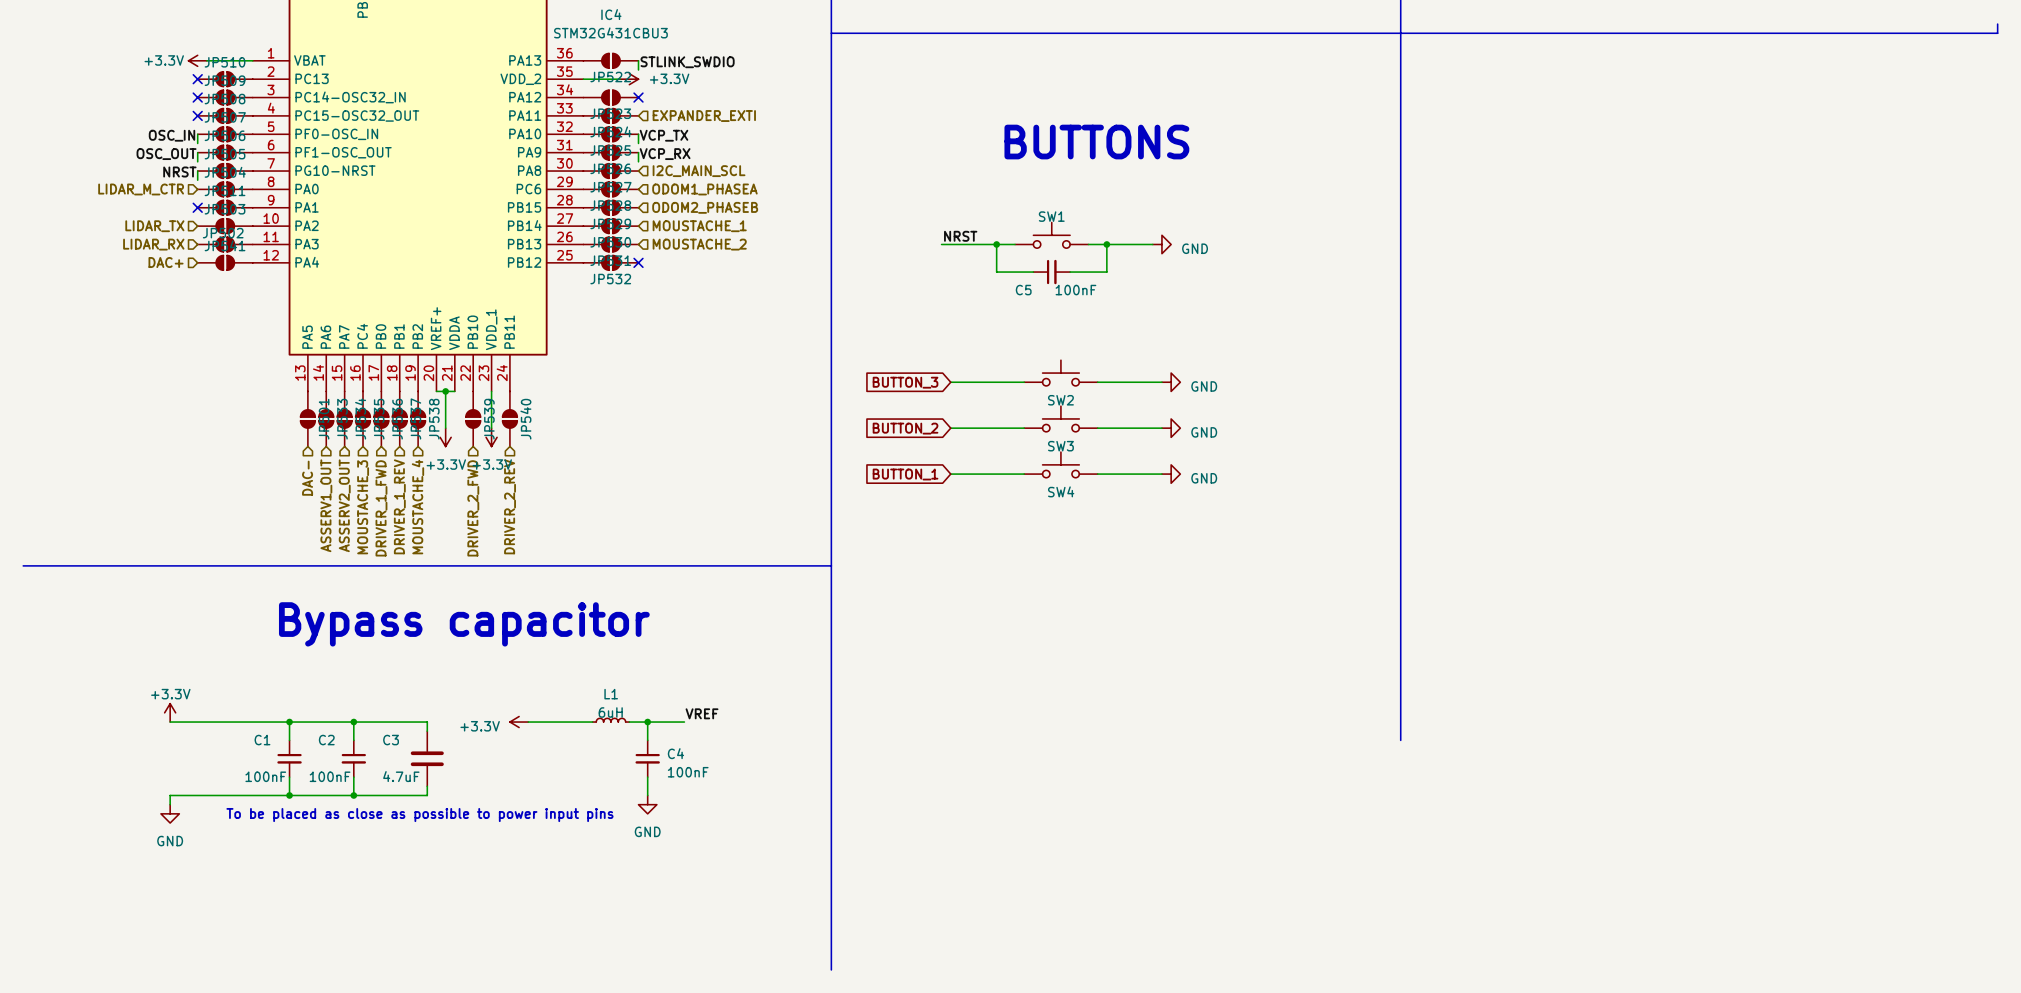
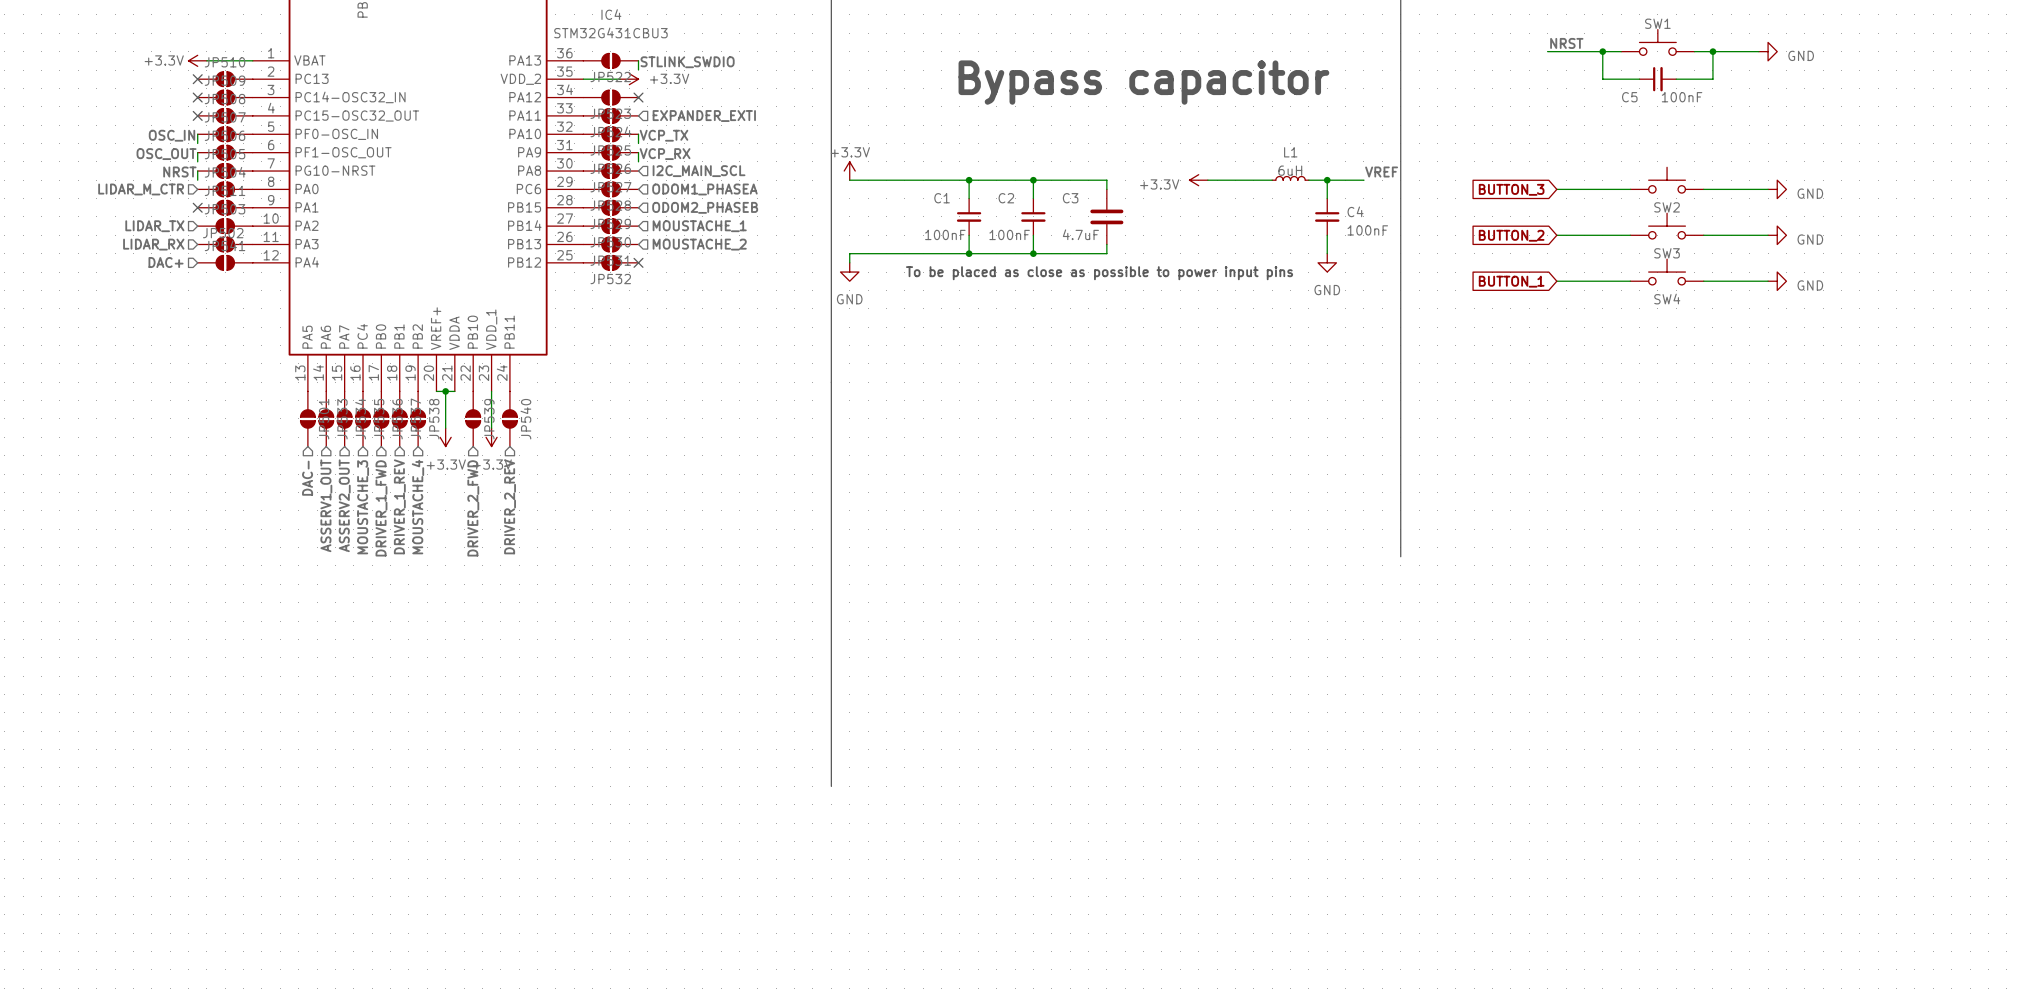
line: (1997, 24) (1997, 33) (831, 33) -> none
label: none -> NRST (1566, 43)
wire: none -> (1547, 51) (1621, 51)
wire: none -> (1602, 51) (1602, 79) (1639, 79)
junction: none -> (1602, 51)
wire: none -> (1694, 51) (1758, 51)
wire: none -> (1712, 51) (1712, 79) (1676, 79)
junction: none -> (1712, 51)
power symbol: none -> GND (1768, 51)
text: none -> Bypass capacitor (1143, 82)
text: BUTTONS (1096, 142) -> none
power symbol: none -> +3.3V (849, 171)
label: none -> VREF (1381, 172)
wire: none -> (849, 180) (1106, 180) (1106, 189)
wire: none -> (969, 180) (969, 198)
junction: none -> (969, 180)
wire: none -> (1033, 180) (1033, 198)
junction: none -> (1033, 180)
power symbol: none -> +3.3V (1198, 180)
wire: none -> (1308, 180) (1363, 180)
wire: none -> (1327, 180) (1327, 198)
junction: none -> (1327, 180)
global label: none -> BUTTON_3 (1511, 189)
wire: none -> (1556, 189) (1630, 189)
wire: none -> (1703, 189) (1768, 189)
power symbol: none -> GND (1777, 189)
wire: none -> (969, 235) (969, 253)
wire: none -> (1033, 235) (1033, 253)
SW1 position: (1051, 235) -> (1657, 42)
wire: none -> (1327, 235) (1327, 253)
global label: none -> BUTTON_2 (1511, 235)
wire: none -> (1556, 235) (1630, 235)
wire: none -> (1703, 235) (1768, 235)
power symbol: none -> GND (1777, 235)
label: NRST (960, 236) -> none
wire: (941, 244) (1015, 244) -> none
wire: (996, 244) (996, 272) (1033, 272) -> none
junction: (996, 244) -> none
wire: (1088, 244) (1152, 244) -> (1207, 180) (1272, 180)
junction: (1106, 244) -> none
power symbol: GND (1161, 244) -> none
junction: none -> (969, 253)
junction: none -> (1033, 253)
wire: (1106, 253) (1106, 272) (1070, 272) -> (1106, 253) (849, 253) (849, 262)
power symbol: none -> GND (1327, 262)
power symbol: none -> GND (849, 272)
C5 position: (1051, 272) -> (1657, 79)
text: none -> To be placed as close as possible to power input pins (1099, 273)
global label: none -> BUTTON_1 (1511, 281)
wire: none -> (1556, 281) (1630, 281)
wire: none -> (1703, 281) (1768, 281)
power symbol: none -> GND (1777, 281)
SW2 position: (1060, 373) -> (1667, 180)
global label: BUTTON_3 (905, 382) -> none
wire: (950, 382) (1024, 382) -> none
wire: (1097, 382) (1161, 382) -> none
power symbol: GND (1171, 382) -> none
SW3 position: (1060, 418) -> (1667, 226)
global label: BUTTON_2 (905, 428) -> none
wire: (950, 428) (1024, 428) -> none
wire: (1097, 428) (1161, 428) -> none
power symbol: GND (1171, 428) -> none
SW4 position: (1060, 464) -> (1667, 272)
global label: BUTTON_1 (905, 474) -> none
wire: (950, 474) (1024, 474) -> none
wire: (1097, 474) (1161, 474) -> none
power symbol: GND (1171, 474) -> none
line: (1400, 556) (1400, 740) -> none
line: (23, 565) (831, 565) -> none
text: Bypass capacitor (464, 624) -> none
power symbol: +3.3V (170, 712) -> none
label: VREF (702, 713) -> none
L1 position: (610, 720) -> (1290, 178)
wire: (170, 722) (427, 722) (427, 731) -> none
wire: (289, 722) (289, 740) -> none
junction: (289, 722) -> none
wire: (353, 722) (353, 740) -> none
junction: (353, 722) -> none
power symbol: +3.3V (519, 722) -> none
wire: (528, 722) (592, 722) -> none
wire: (629, 722) (684, 722) -> none
wire: (647, 722) (647, 740) -> none
junction: (647, 722) -> none
C1 position: (289, 758) -> (969, 216)
C2 position: (353, 758) -> (1033, 216)
C3 position: (427, 758) -> (1106, 216)
C4 position: (647, 758) -> (1327, 216)
wire: (289, 777) (289, 795) -> none
wire: (353, 777) (353, 795) -> none
wire: (647, 777) (647, 795) -> none
wire: (427, 786) (427, 795) (170, 795) (170, 804) -> none
line: (831, 786) (831, 969) -> none
junction: (289, 795) -> none
junction: (353, 795) -> none
power symbol: GND (647, 804) -> none
power symbol: GND (170, 813) -> none
text: To be placed as close as possible to power input pins (419, 815) -> none

